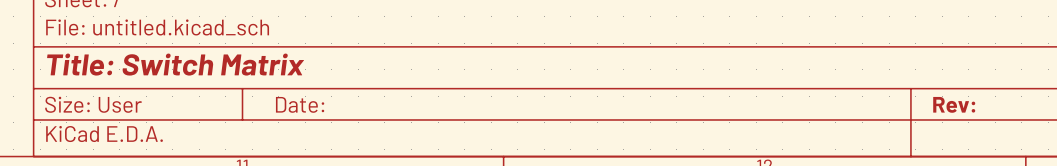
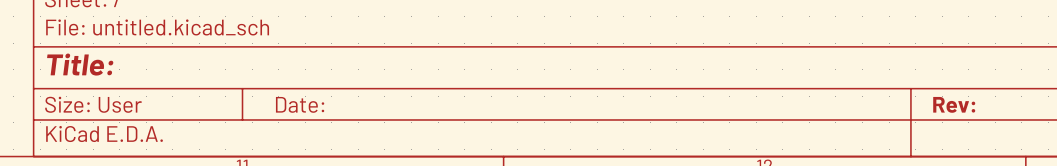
title block: Title: Switch Matrix (175, 64) -> Title: (80, 64)

